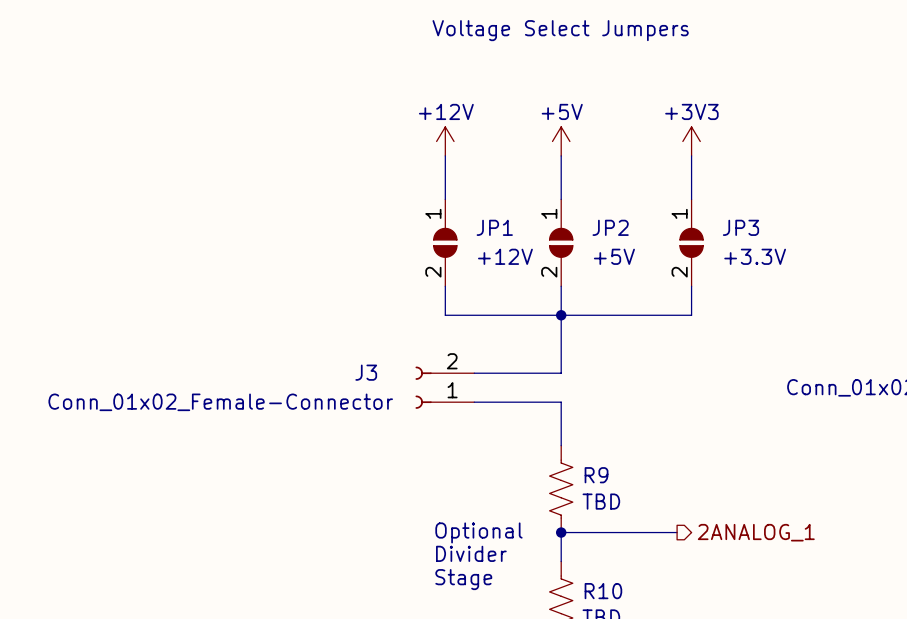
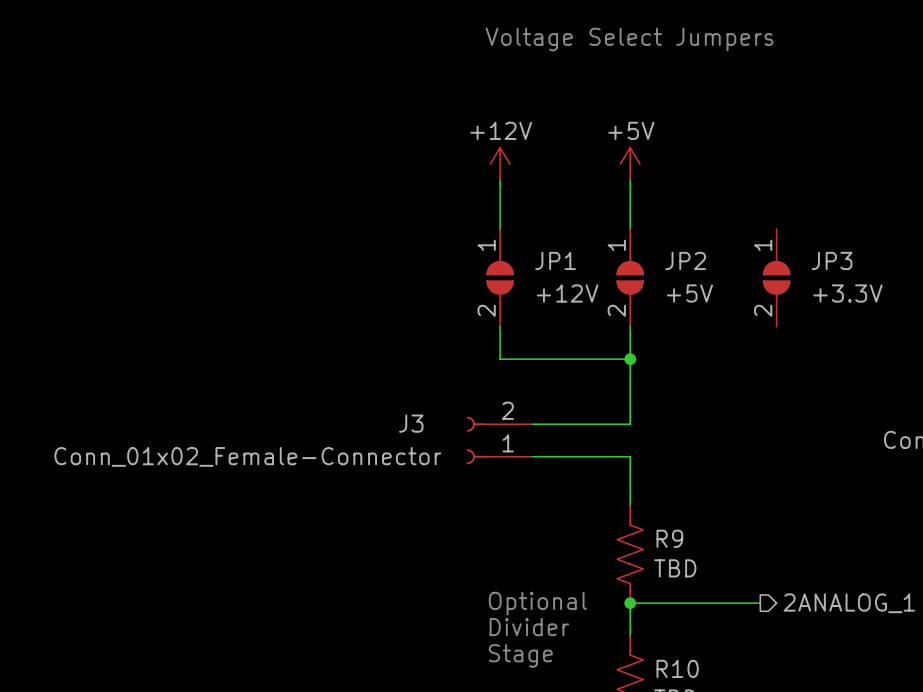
power symbol: +3V3 (691, 141) -> none
wire: (691, 155) (691, 199) -> none
wire: (691, 286) (691, 315) (561, 315) -> none

